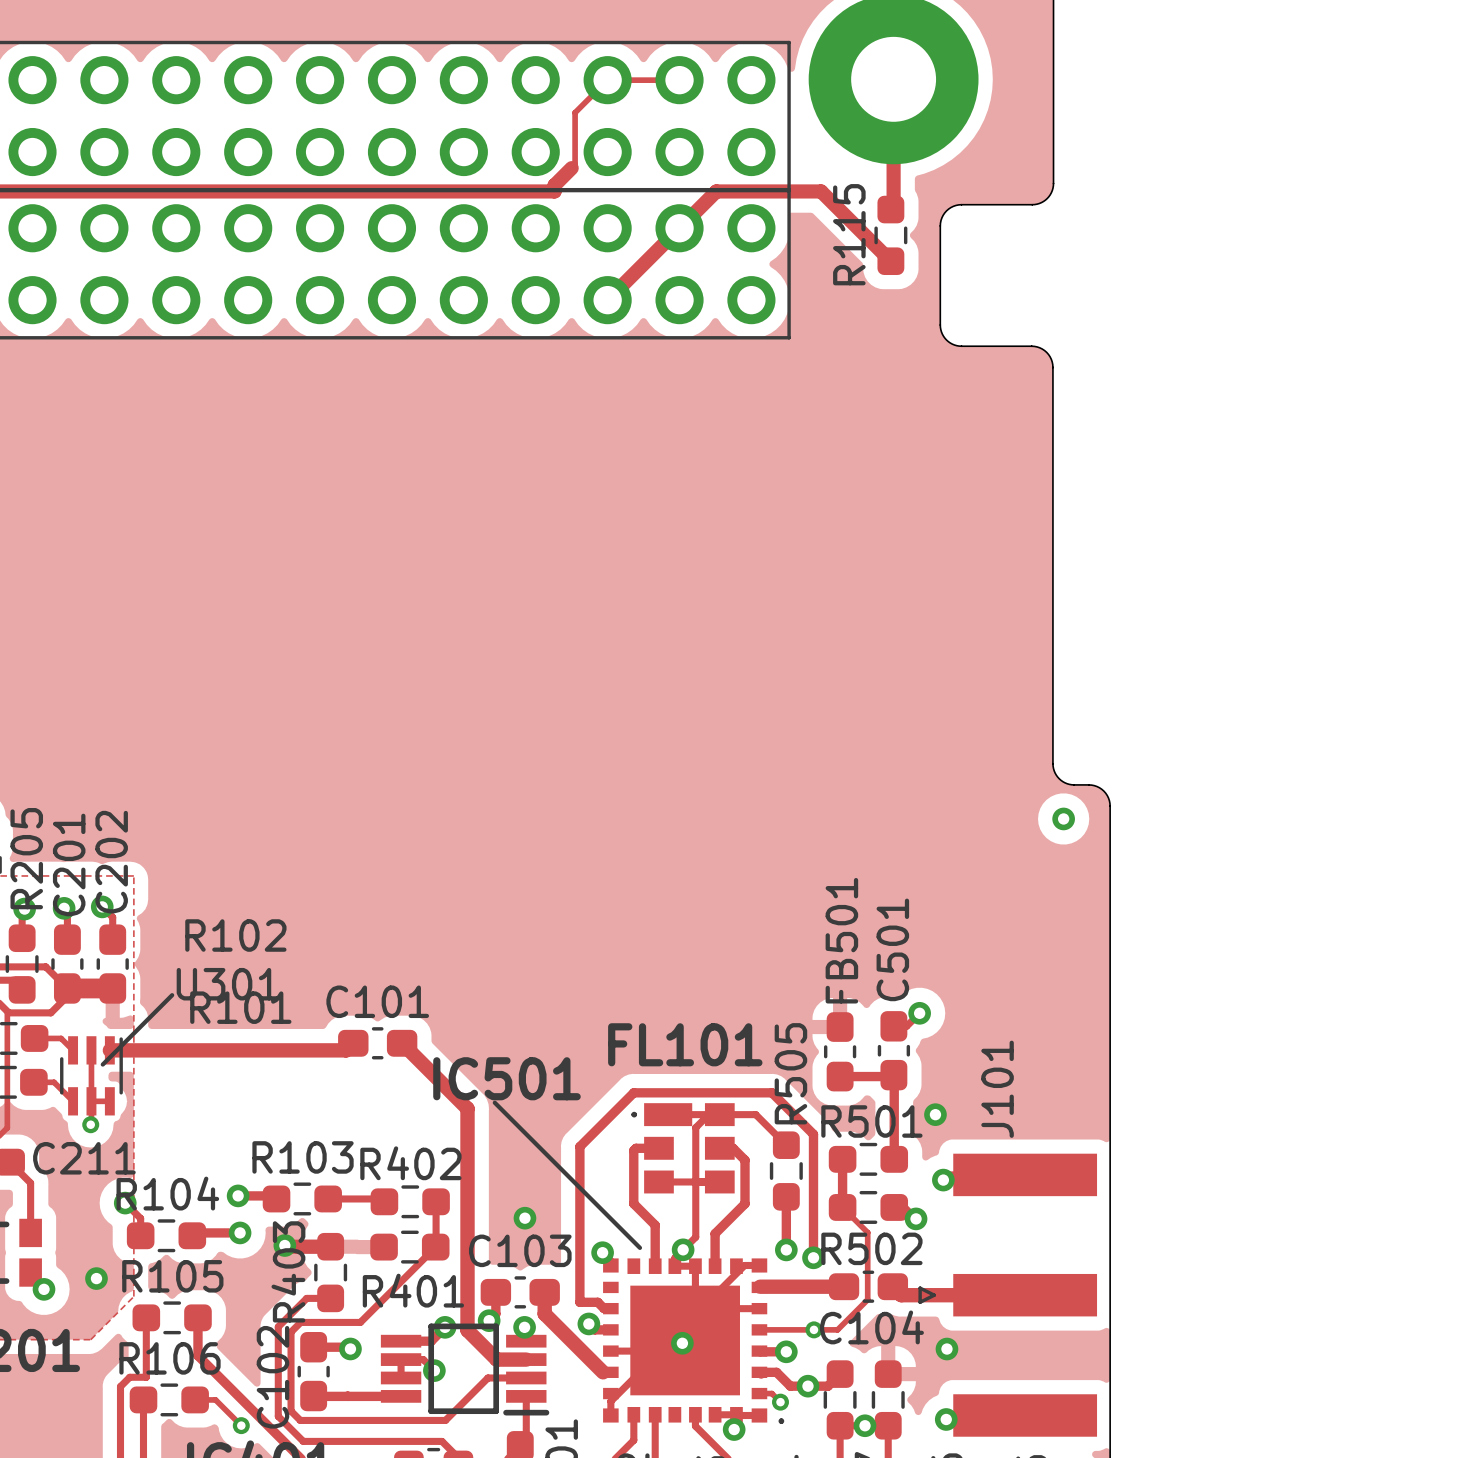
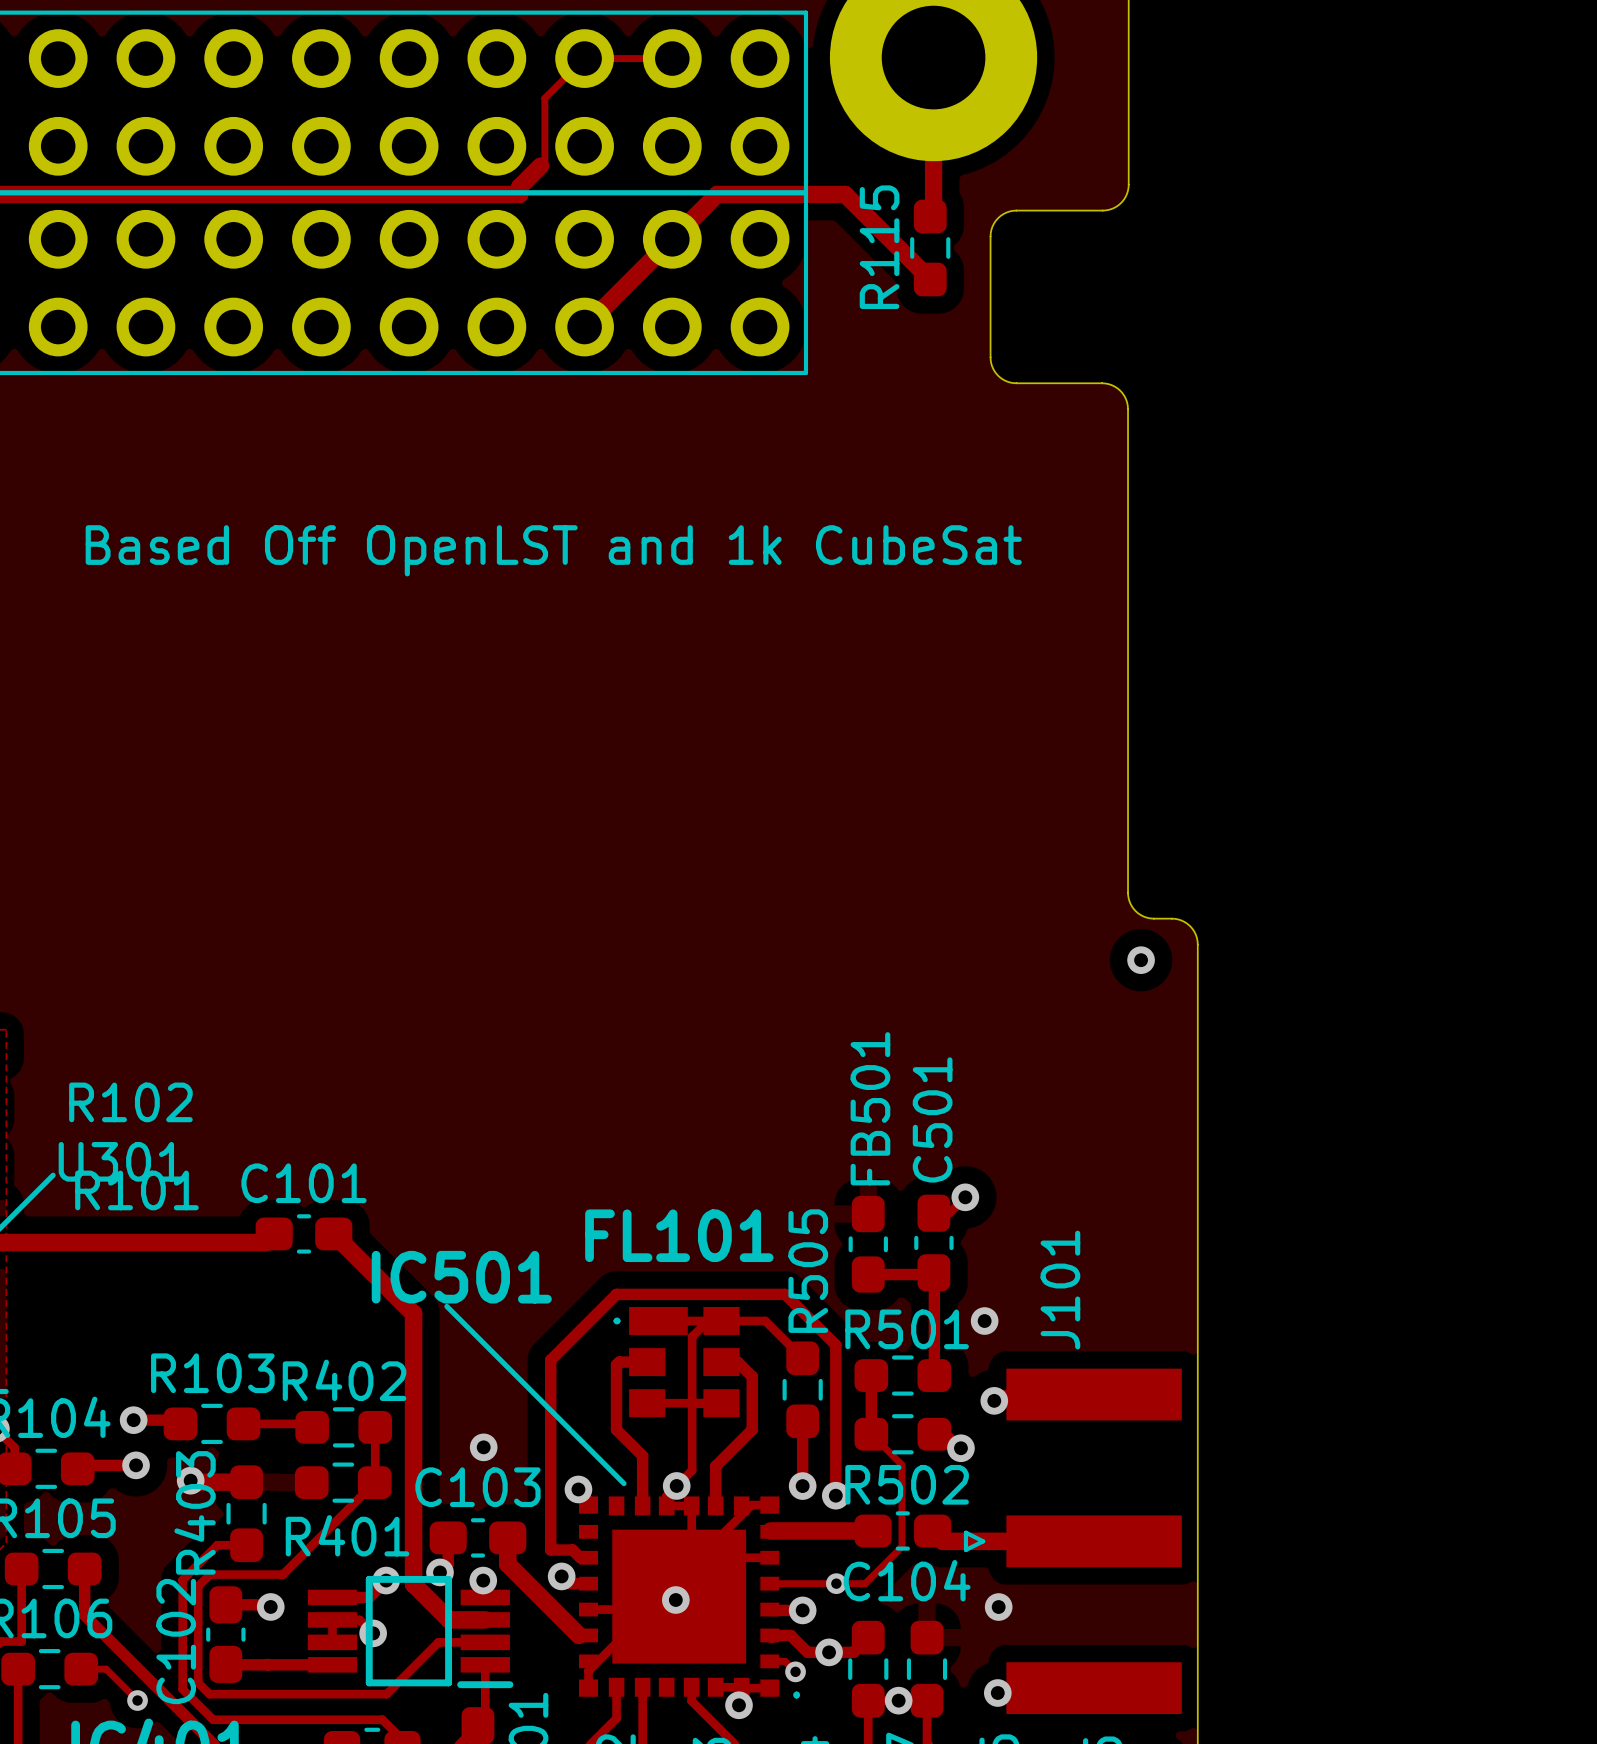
text: none -> Based Off OpenLST and 1k CubeSat (553, 550)

